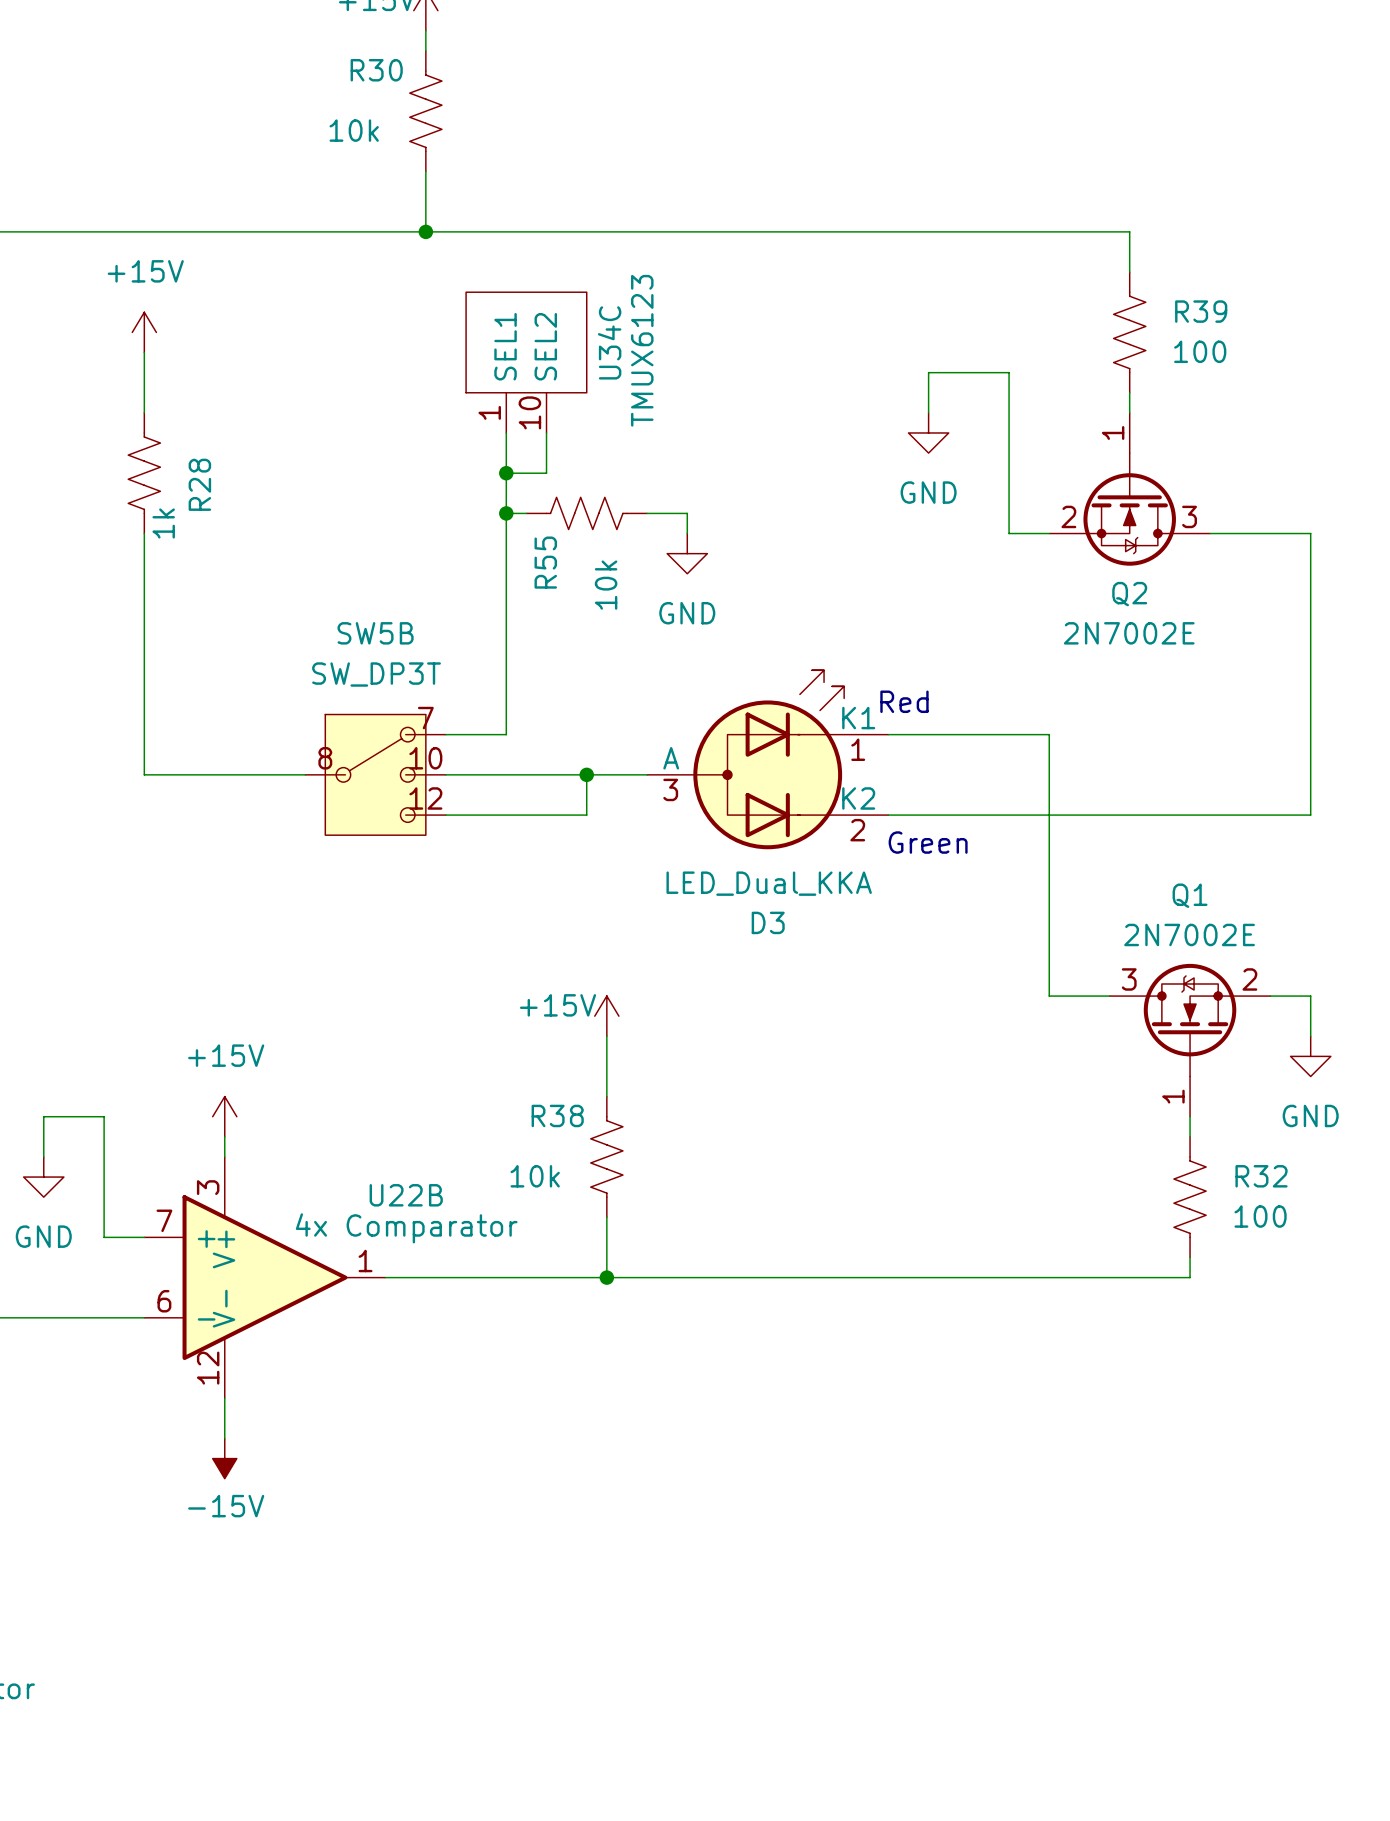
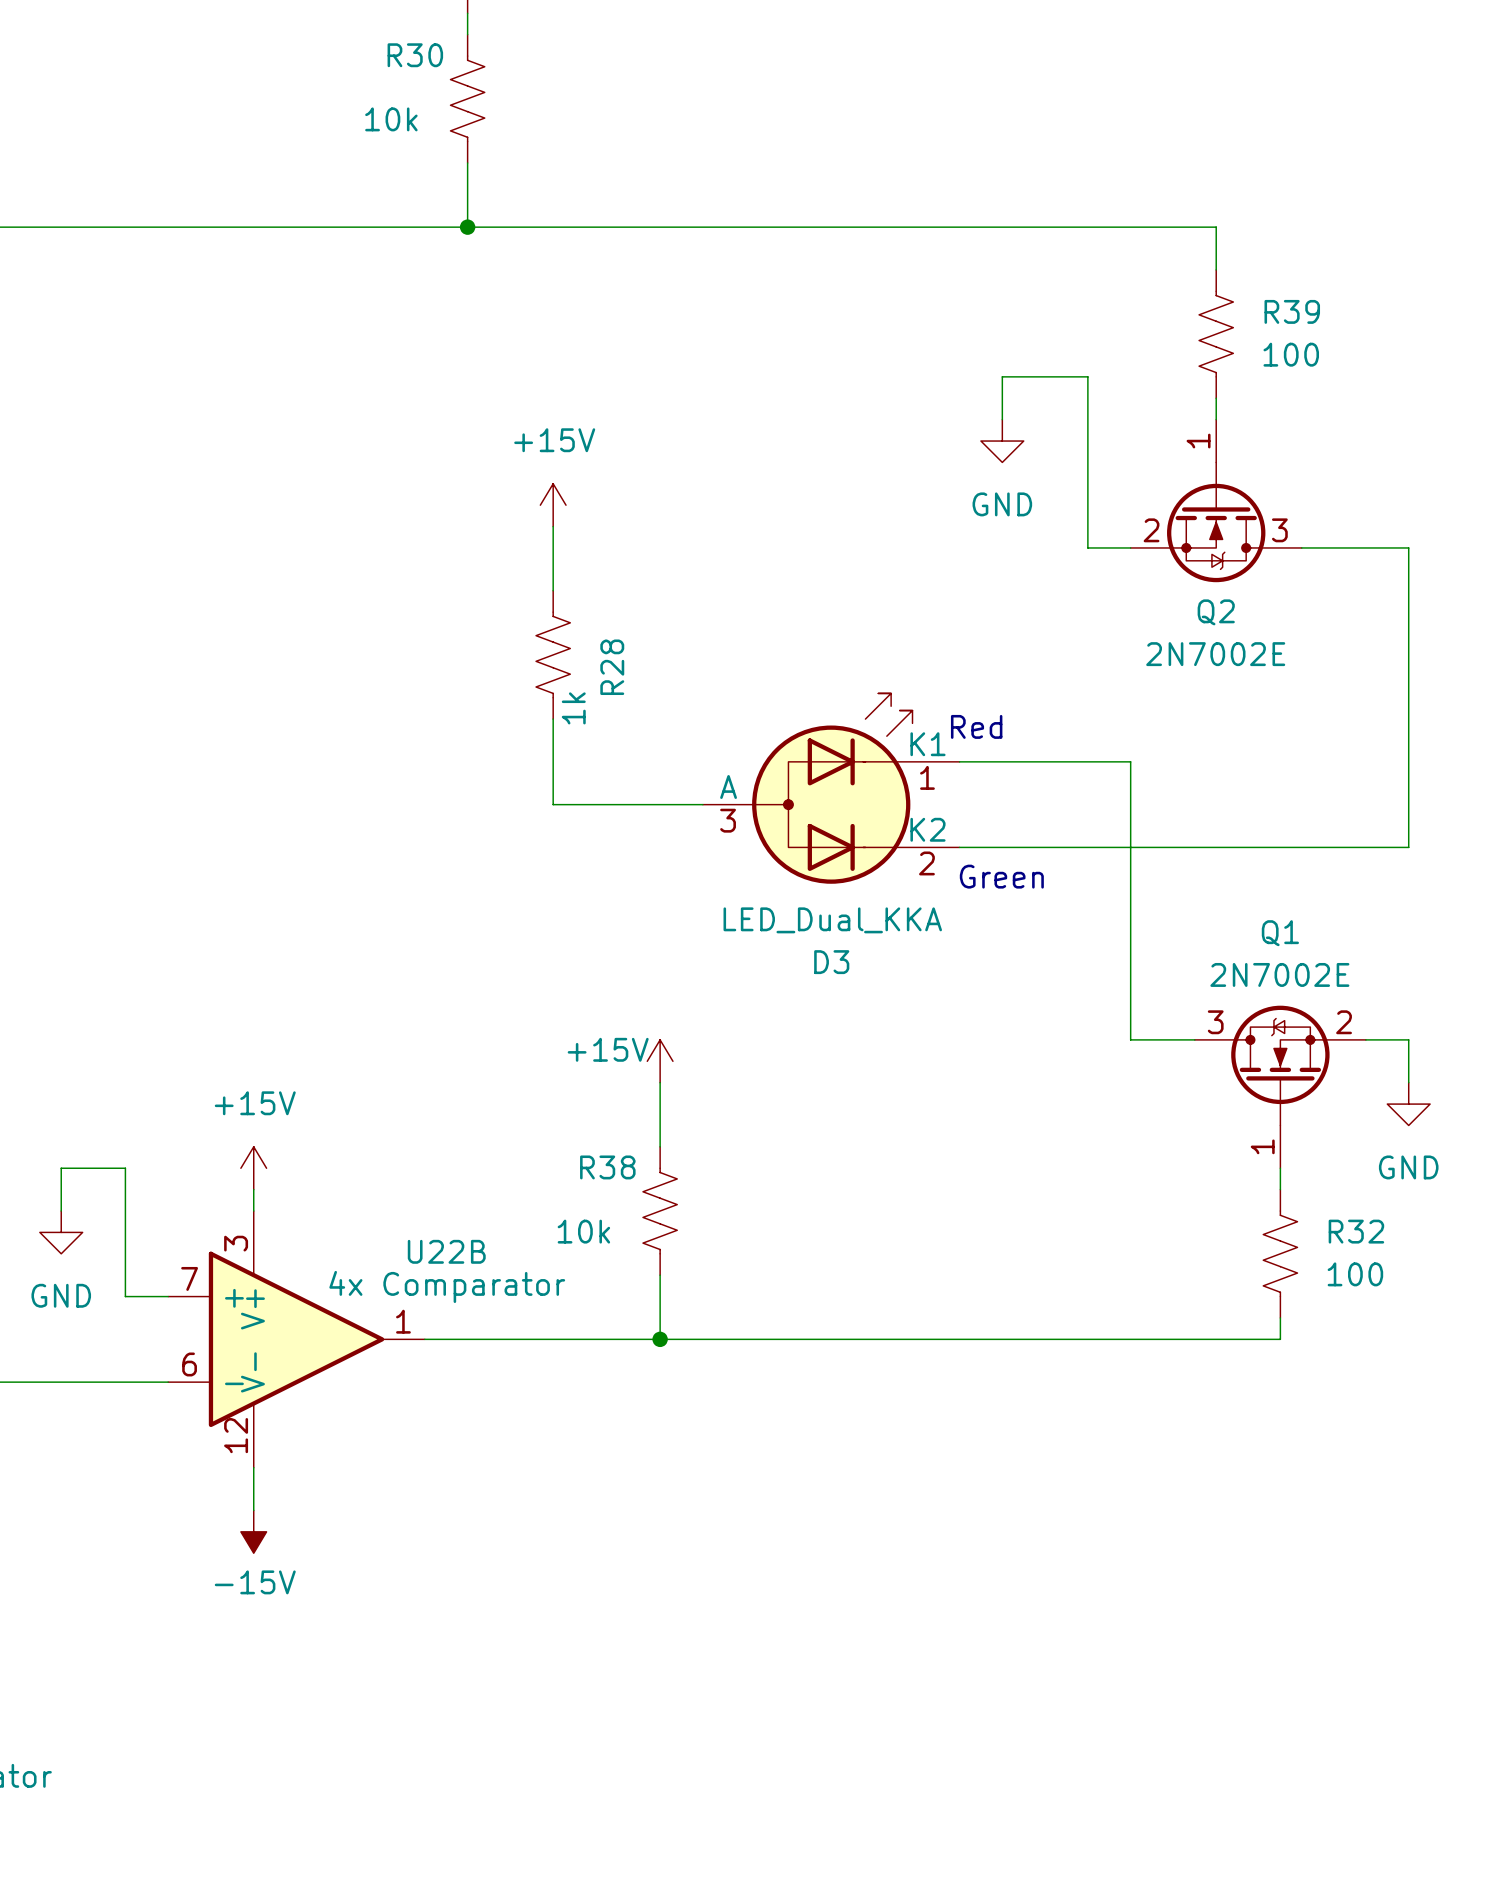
power symbol: +15V (144, 332) -> none
wire: (144, 352) (144, 412) -> none
U34C: TMUX6123 (526, 362) -> none
wire: (506, 432) (506, 513) (526, 513) -> none
wire: (546, 432) (546, 473) (506, 473) -> none
R28 position: (144, 473) -> (553, 654)
junction: (506, 473) -> none
power symbol: none -> +15V (553, 505)
junction: (506, 513) -> none
R55: 10k (586, 513) -> none
wire: (647, 513) (687, 513) (687, 533) -> none
wire: (144, 533) (144, 774) (305, 774) -> none
power symbol: GND (687, 553) -> none
wire: (506, 573) (506, 694) -> none
wire: (445, 734) (506, 734) -> (553, 804) (553, 761)
SW5B: SW_DP3T (375, 774) -> none
wire: (445, 774) (506, 774) -> none
wire: (586, 774) (586, 815) (445, 815) -> none
junction: (586, 774) -> none

